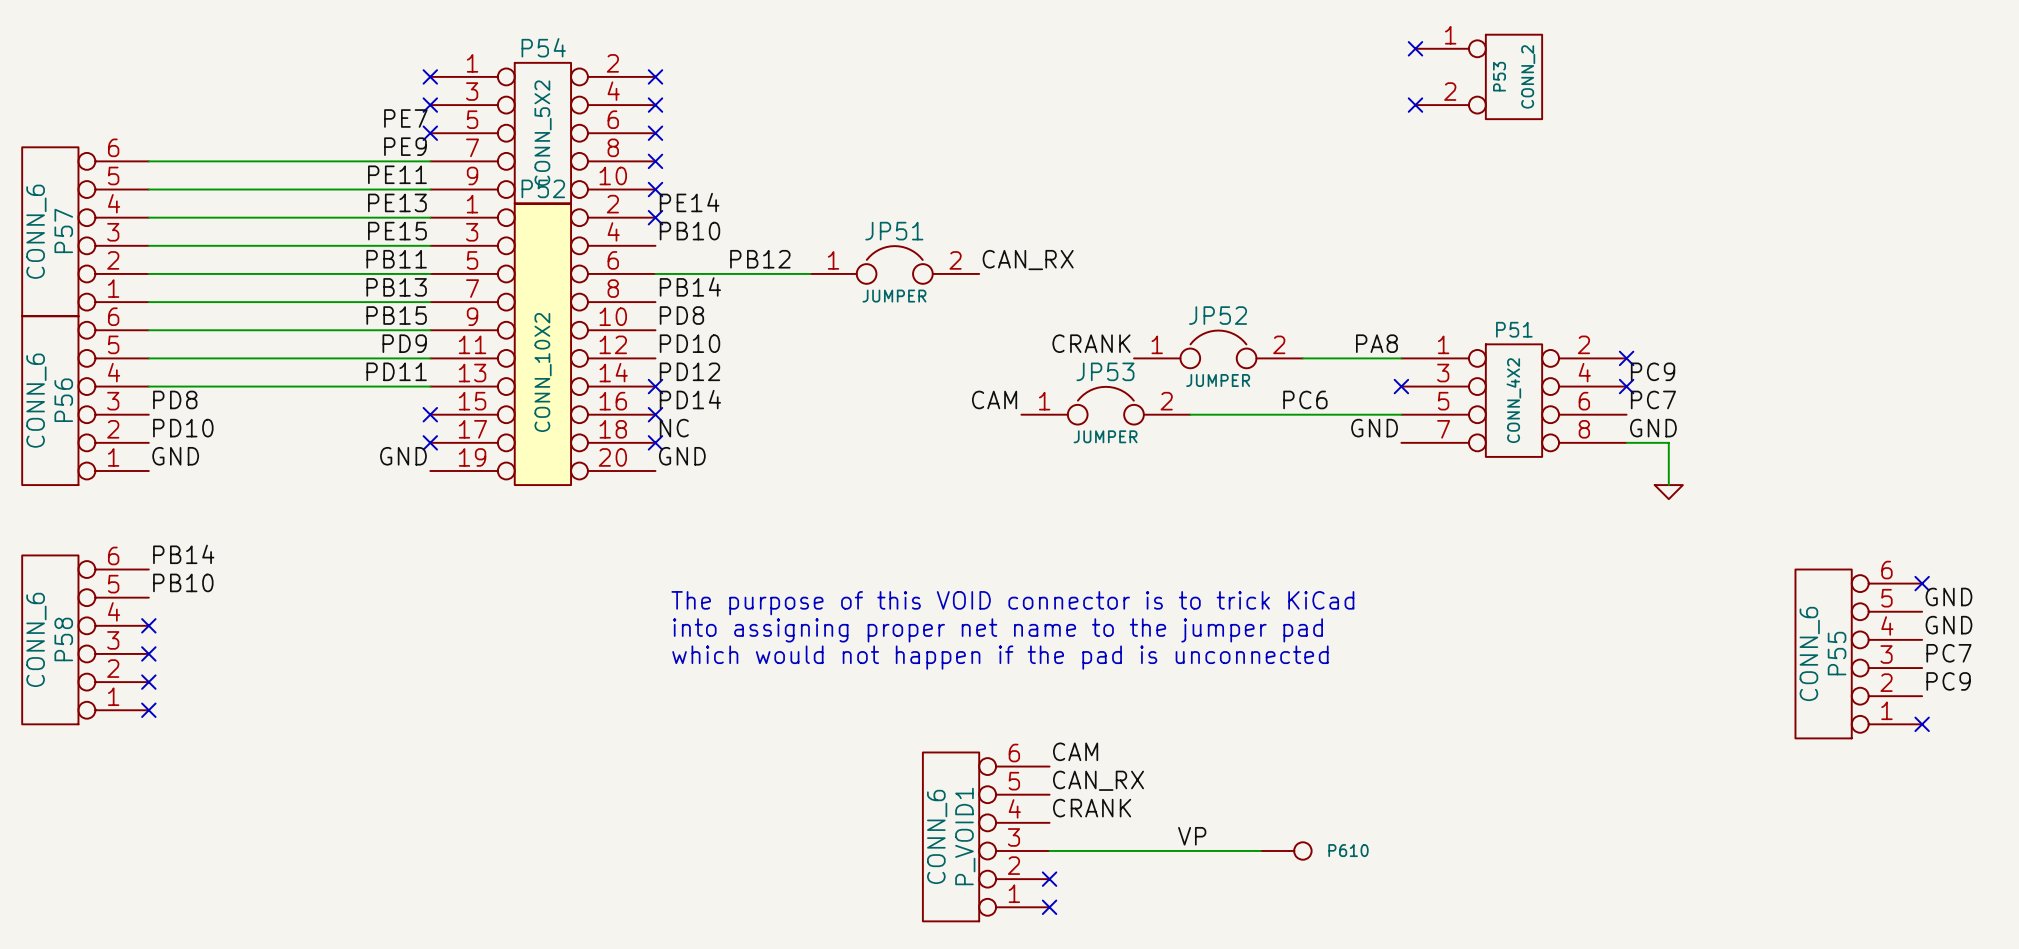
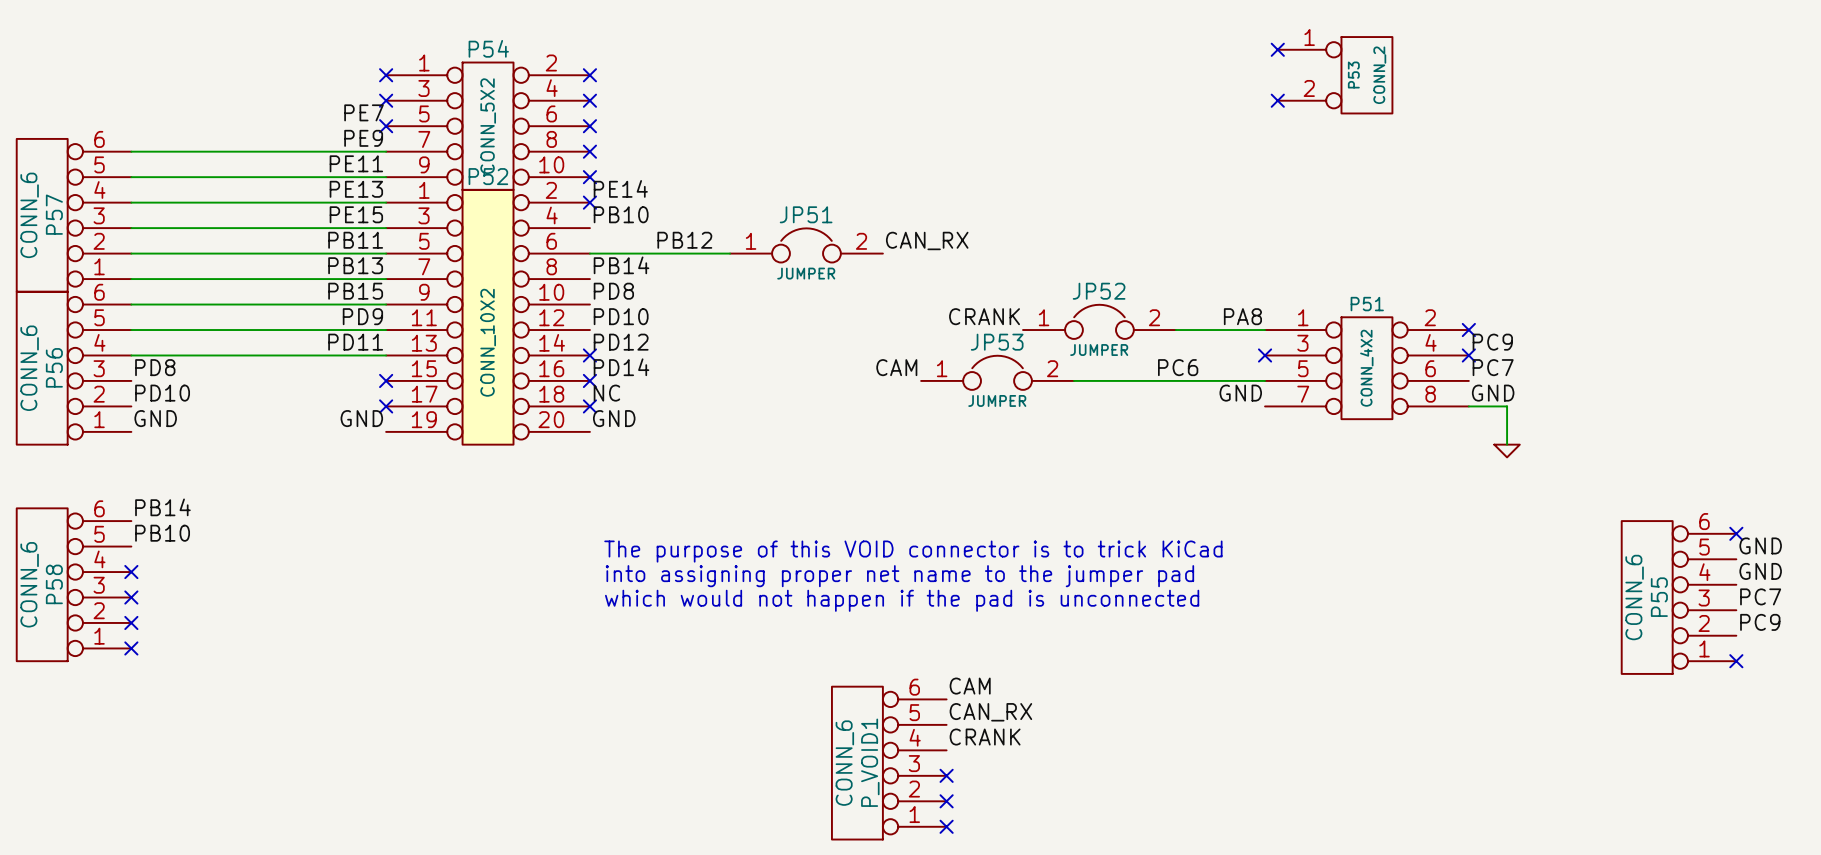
label: VP (1192, 836) -> none
wire: (1049, 850) (1260, 850) -> none
no-connect mark: none -> (946, 775)
P610: (1286, 850) -> none

